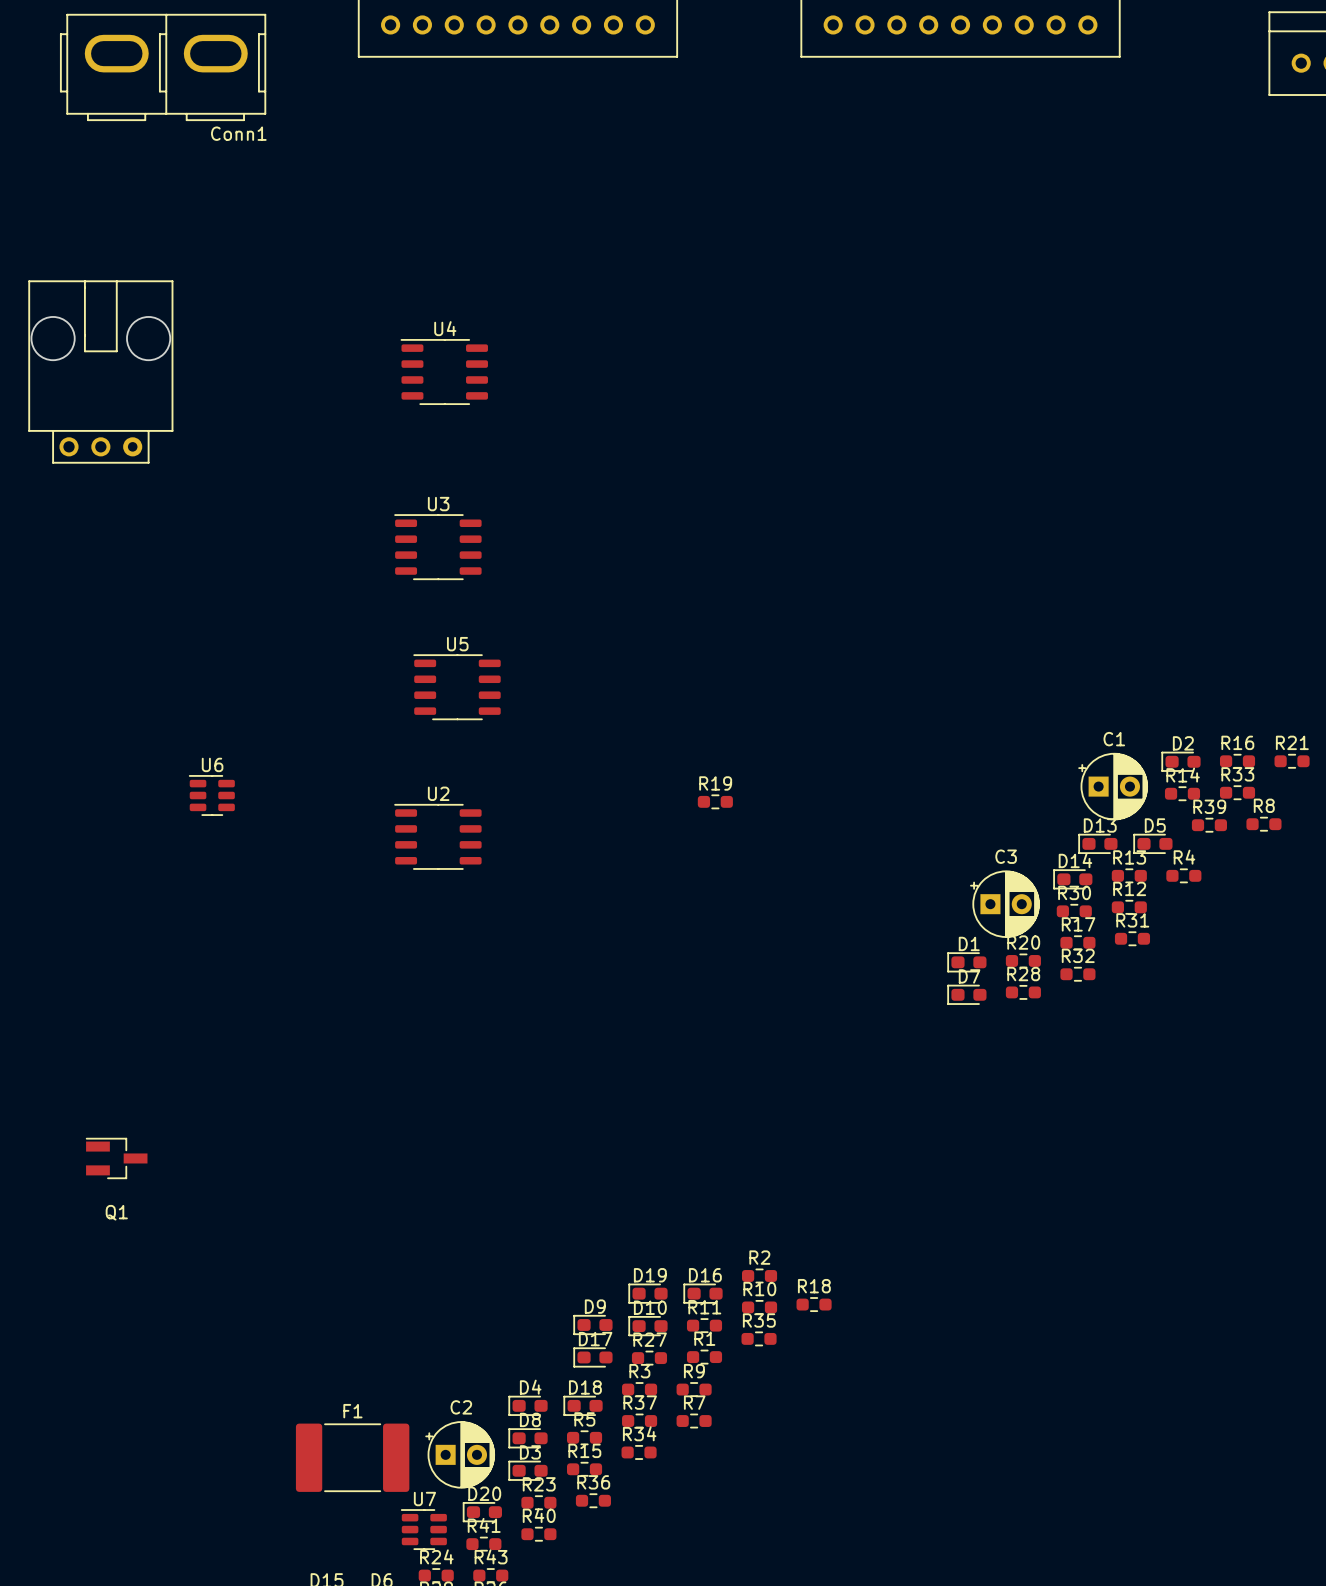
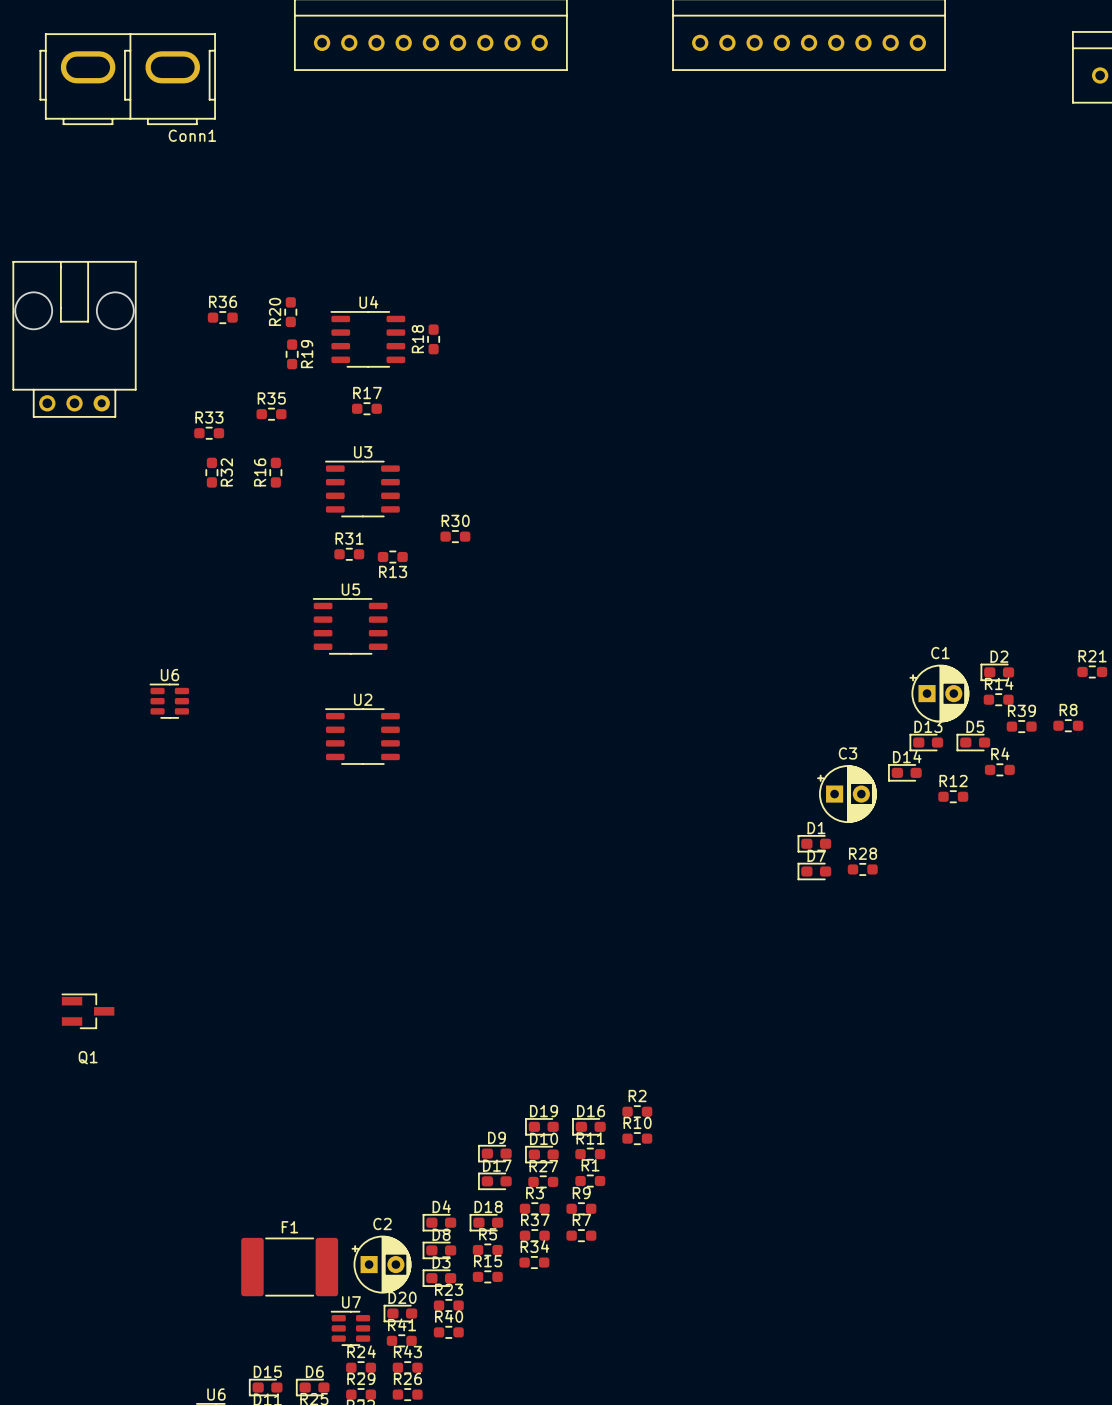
U5 position: (457, 687) -> (350, 626)
R16 name position: R16 (1237, 742) -> R16 (260, 472)
R16 rotation: 0° (1237, 761) -> 90° clockwise (275, 472)
R16 position: (1237, 761) -> (275, 472)
R33 position: (1237, 792) -> (209, 433)
R19 rotation: 0° (715, 801) -> 90° clockwise (292, 354)
R19 position: (715, 801) -> (292, 354)
R13 name position: R13 (1129, 857) -> R13 (393, 571)
R13 position: (1129, 875) -> (392, 557)
R30 position: (1074, 911) -> (455, 536)
R31 position: (1132, 938) -> (349, 554)
R20 name position: R20 (1023, 942) -> R20 (275, 311)
R17 position: (1077, 942) -> (366, 408)
R20 rotation: 0° (1023, 960) -> 90° clockwise (290, 312)
R20 position: (1023, 960) -> (290, 312)
R32 rotation: 0° (1077, 974) -> 90° clockwise (211, 472)
R32 position: (1077, 974) -> (211, 472)
R18 name position: R18 (814, 1286) -> R18 (417, 339)
R18 rotation: 0° (814, 1304) -> 90° clockwise (433, 339)
R18 position: (814, 1304) -> (433, 339)
R35 position: (759, 1338) -> (271, 414)
R36 position: (593, 1500) -> (222, 317)

